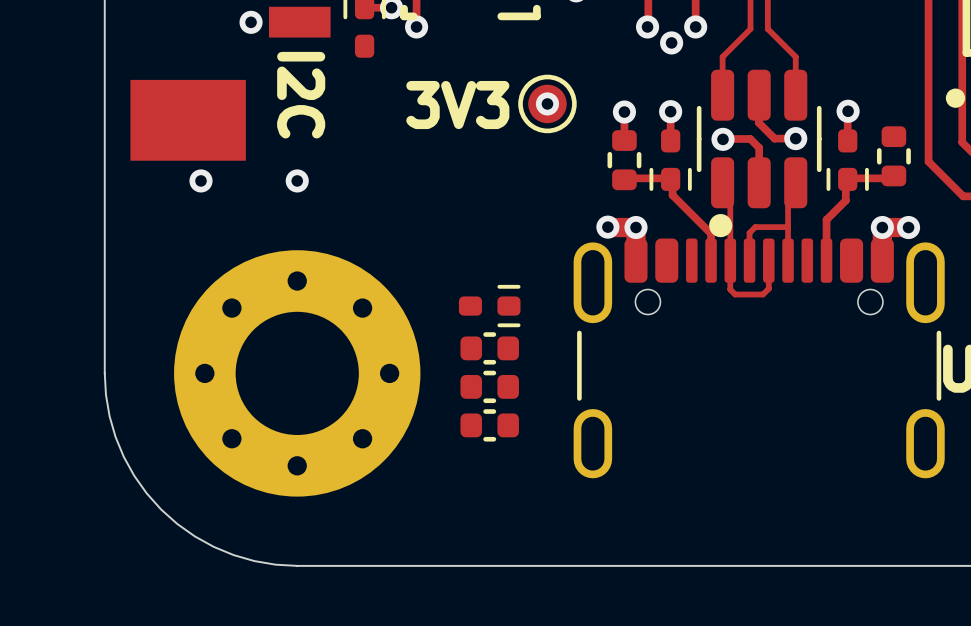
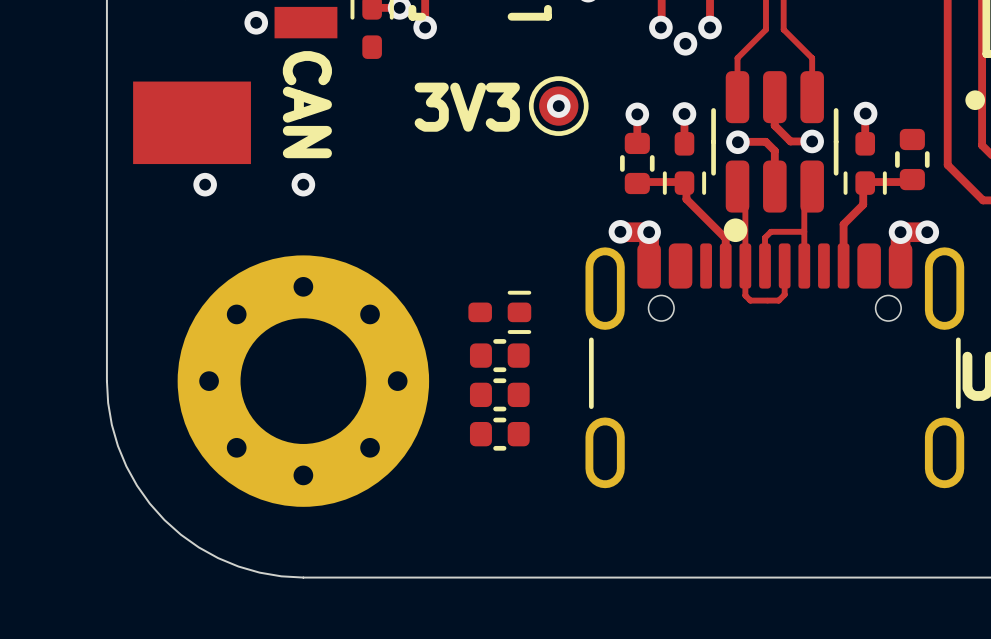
text: I2C (301, 95) -> CAN (307, 104)

